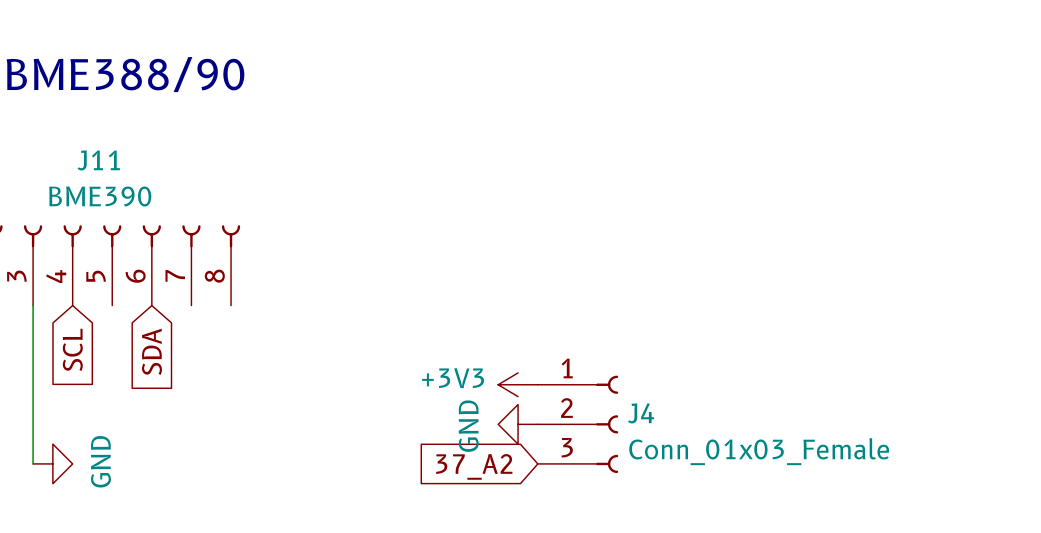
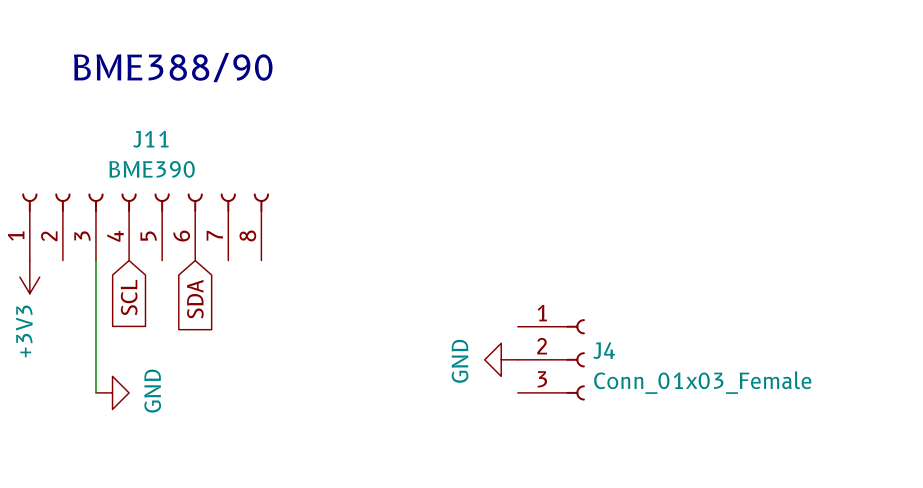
power symbol: +3V3 (518, 384) -> none
global label: 37_A2 (474, 466) -> none

